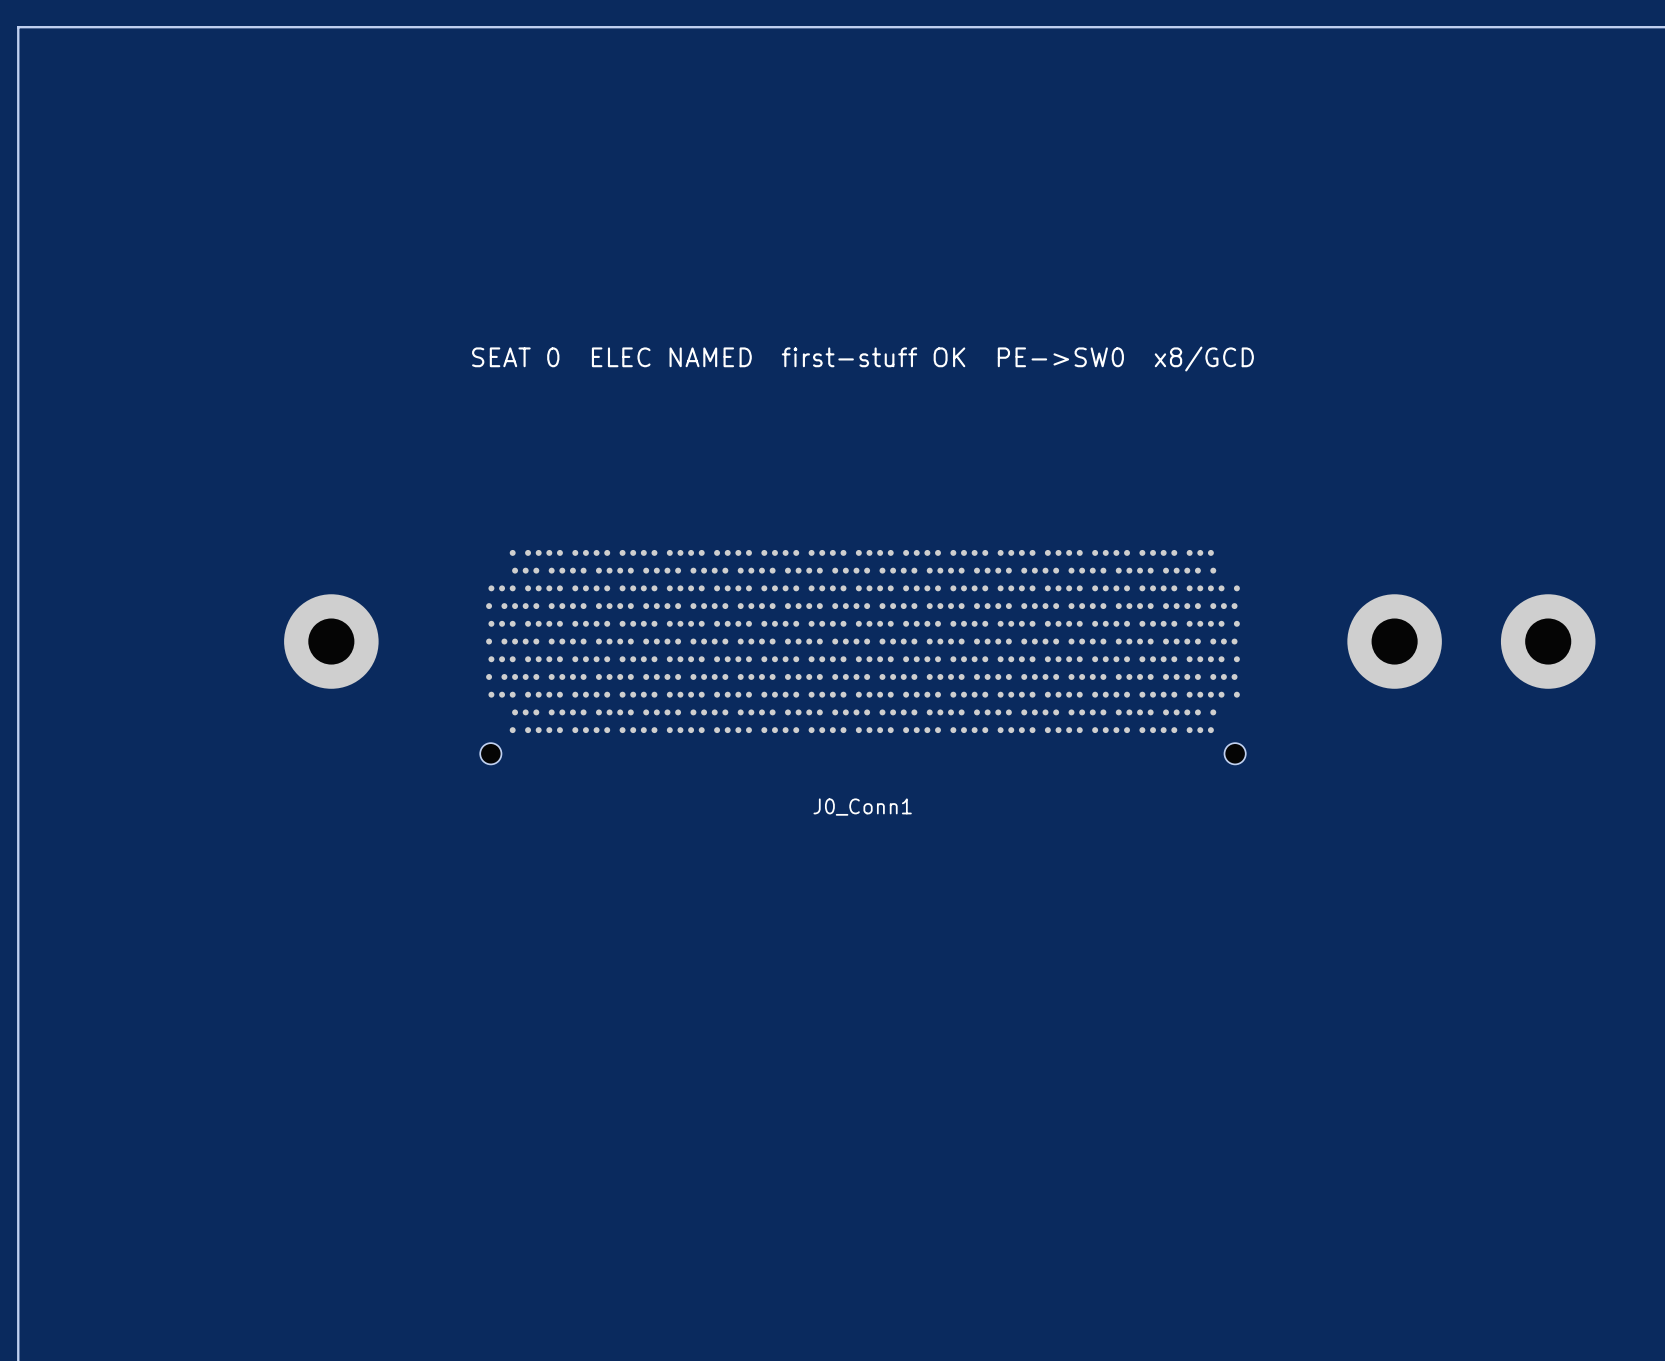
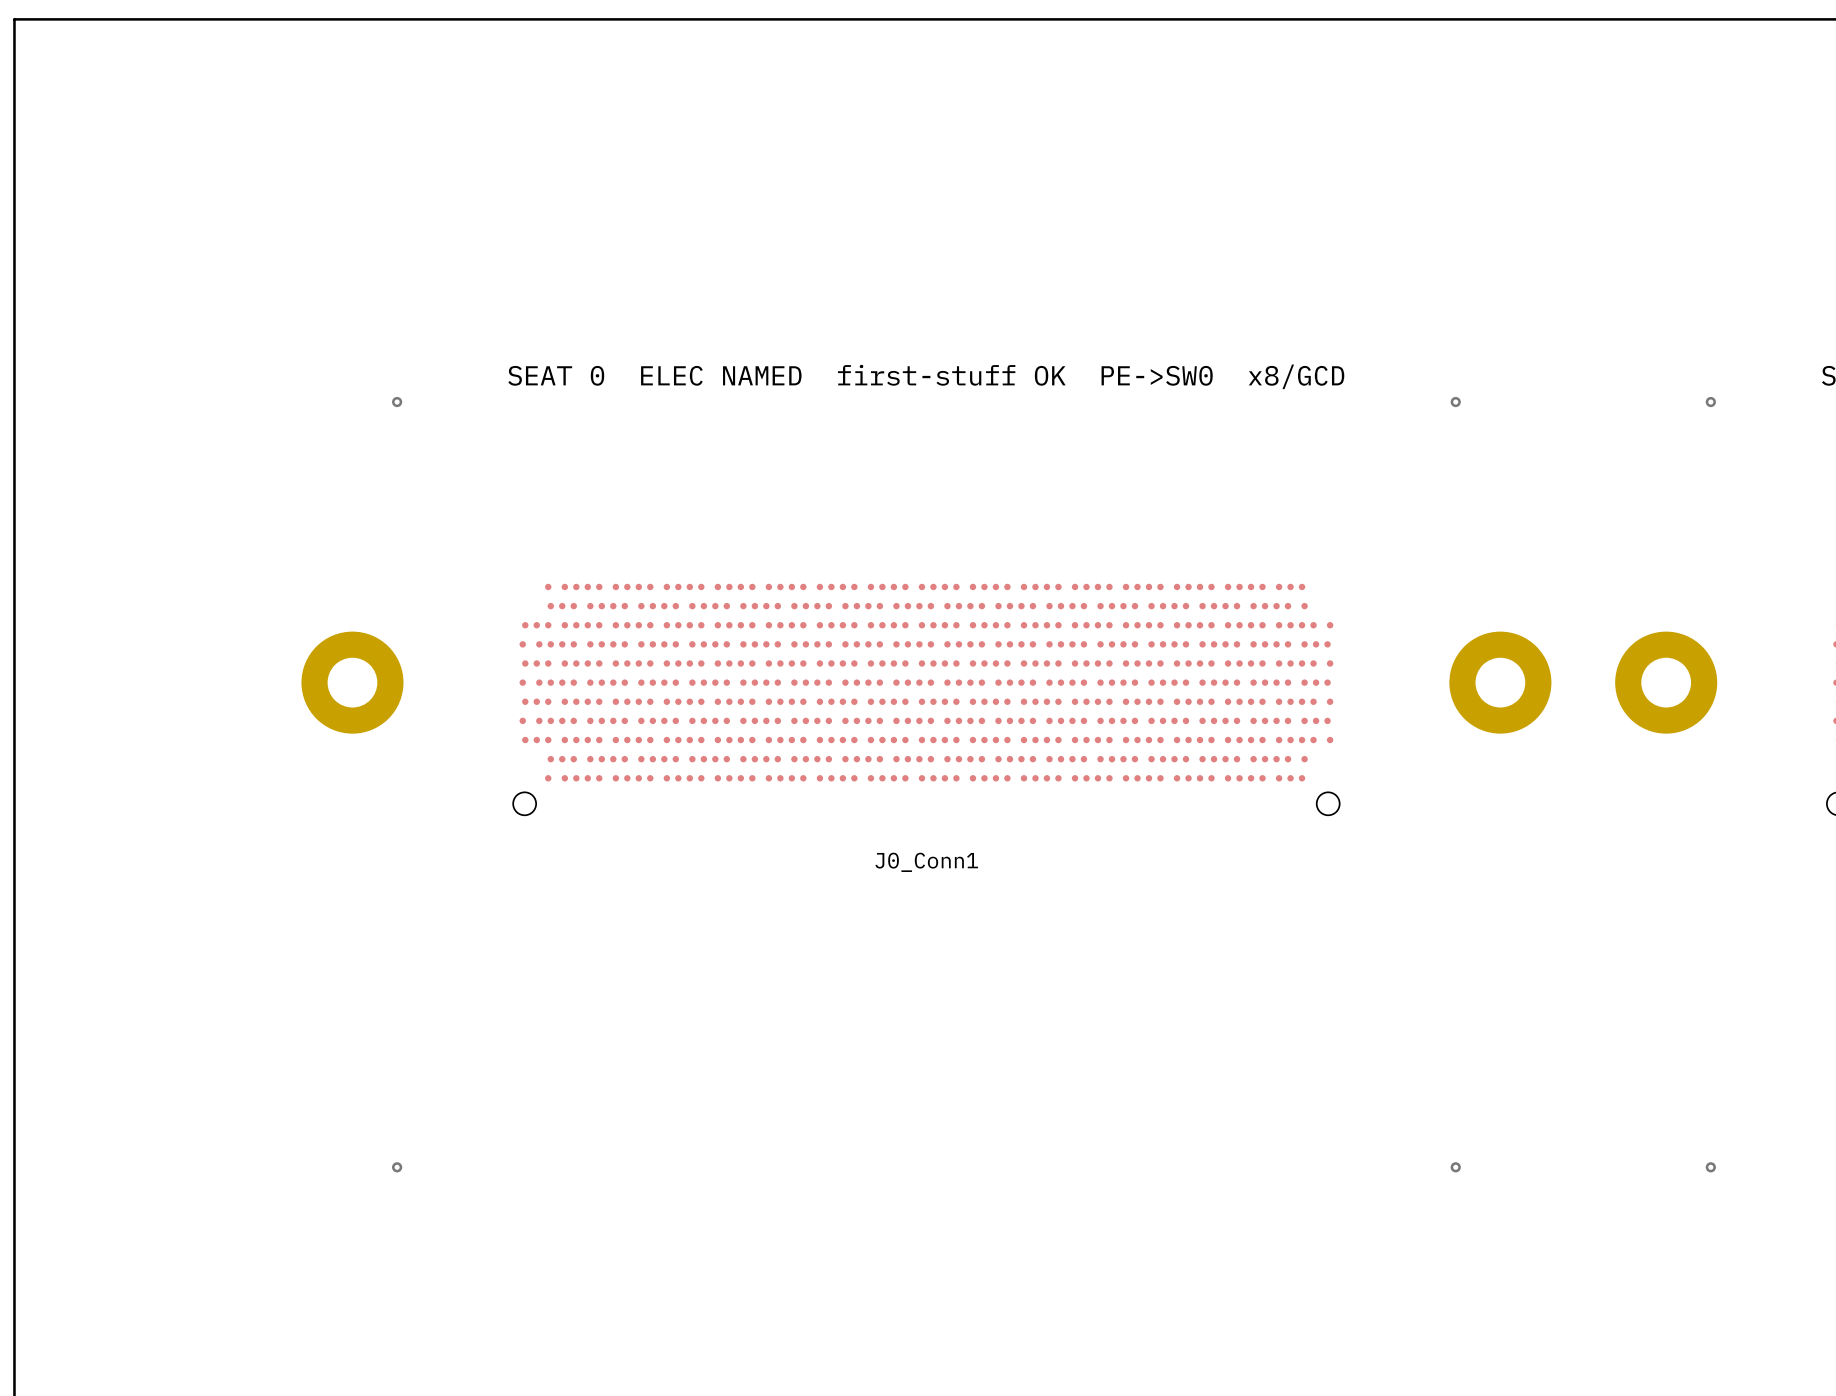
via: none -> (397, 402)
via: none -> (1455, 402)
via: none -> (1710, 402)
via: none -> (397, 1167)
via: none -> (1455, 1167)
via: none -> (1710, 1167)

